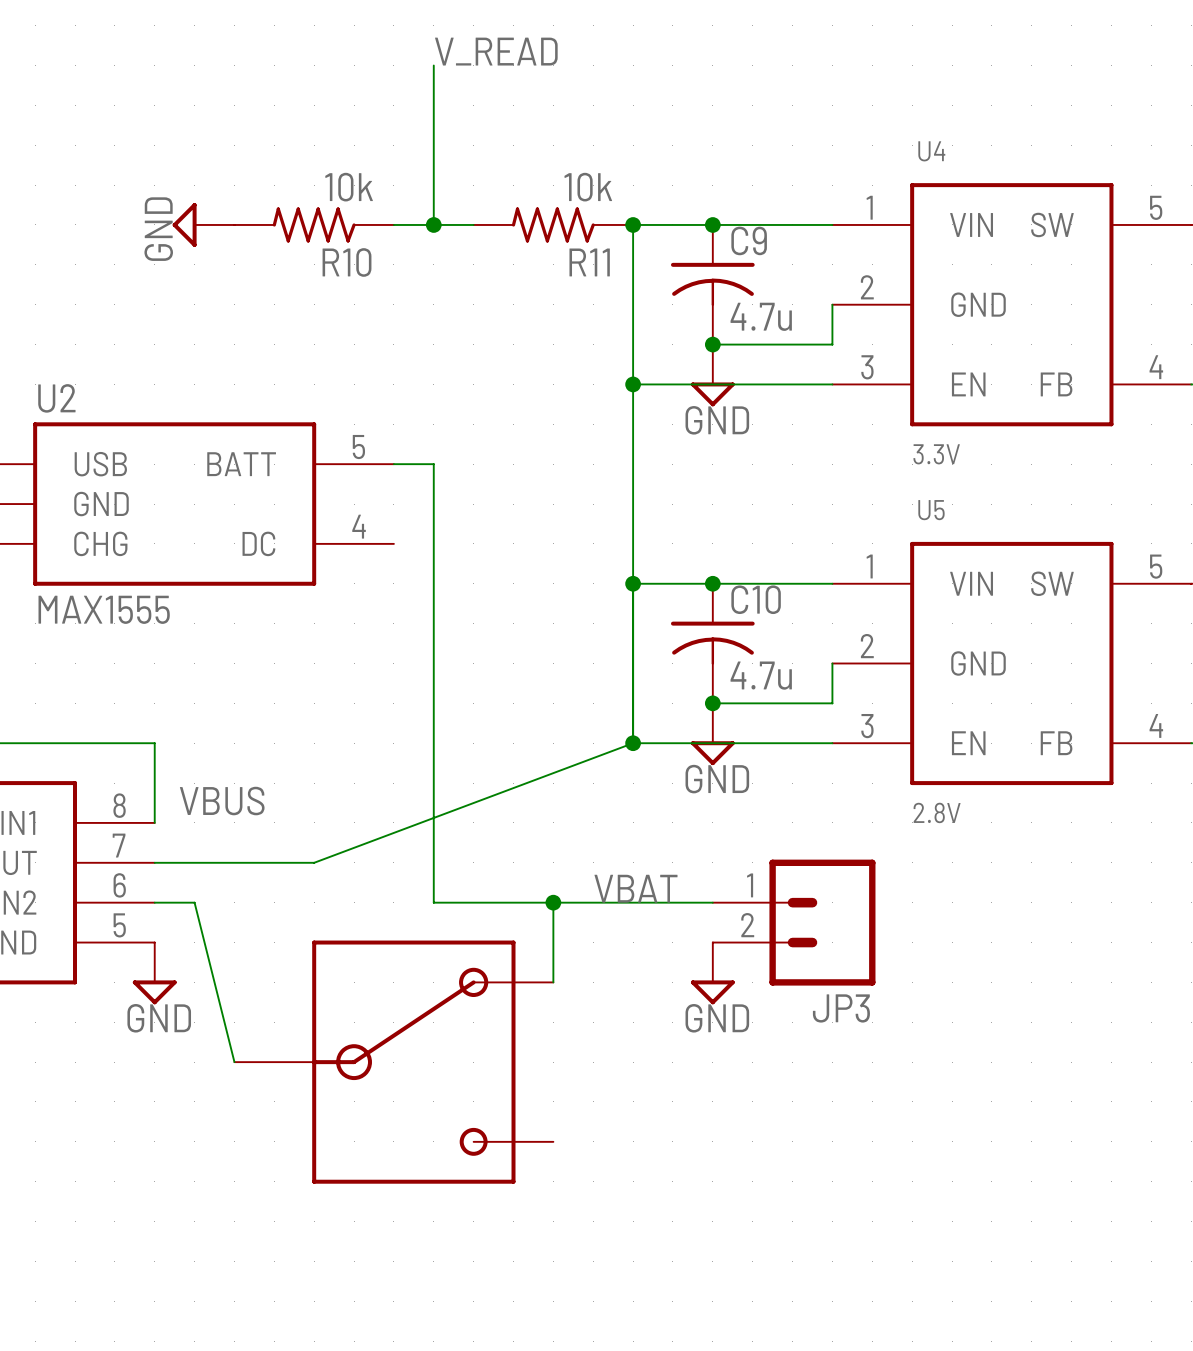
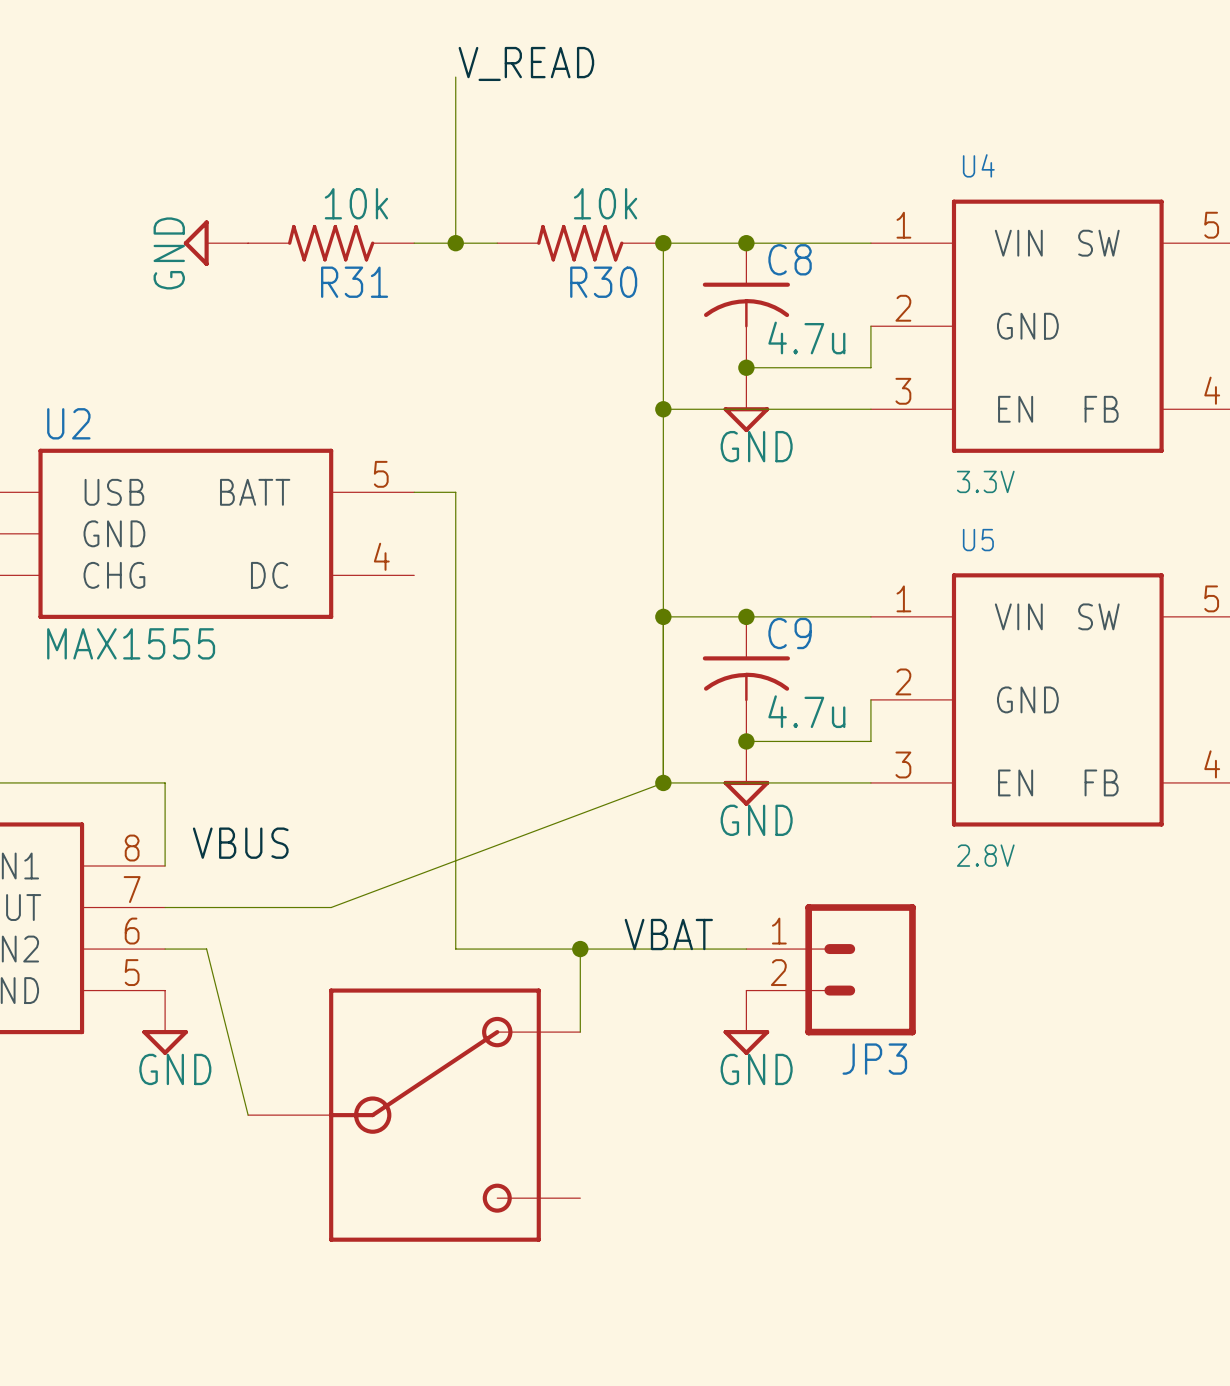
C9 name: C9 (749, 240) -> C8 (790, 259)
R10 name: R10 (347, 262) -> R31 (354, 282)
R11 name: R11 (589, 262) -> R30 (603, 282)
C10 name: C10 (756, 599) -> C9 (790, 633)

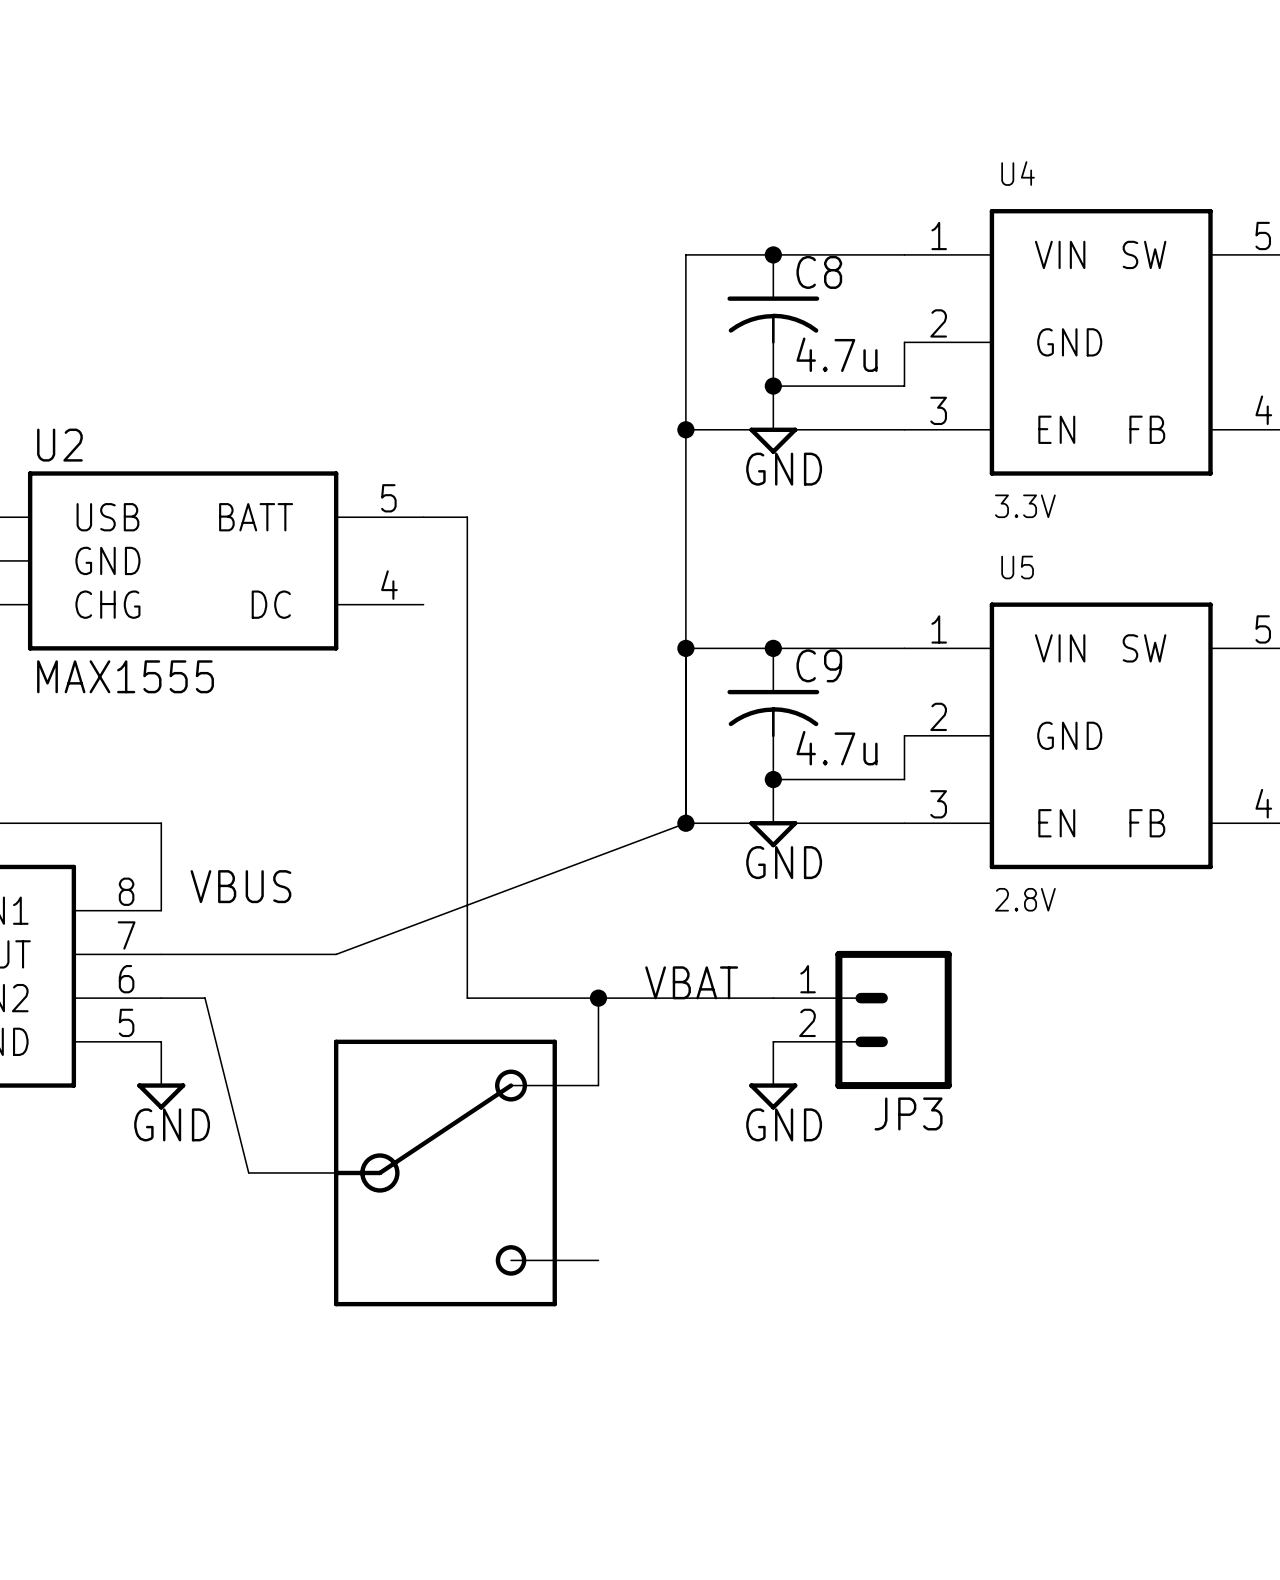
label: V_READ (526, 63) -> none
wire: (455, 77) (455, 243) -> none
power symbol: GND (215, 243) -> none
R31: 10k (331, 243) -> none
wire: (414, 243) (497, 243) -> none
junction: (455, 243) -> none
R30: 10k (580, 243) -> none
junction: (663, 243) -> none

